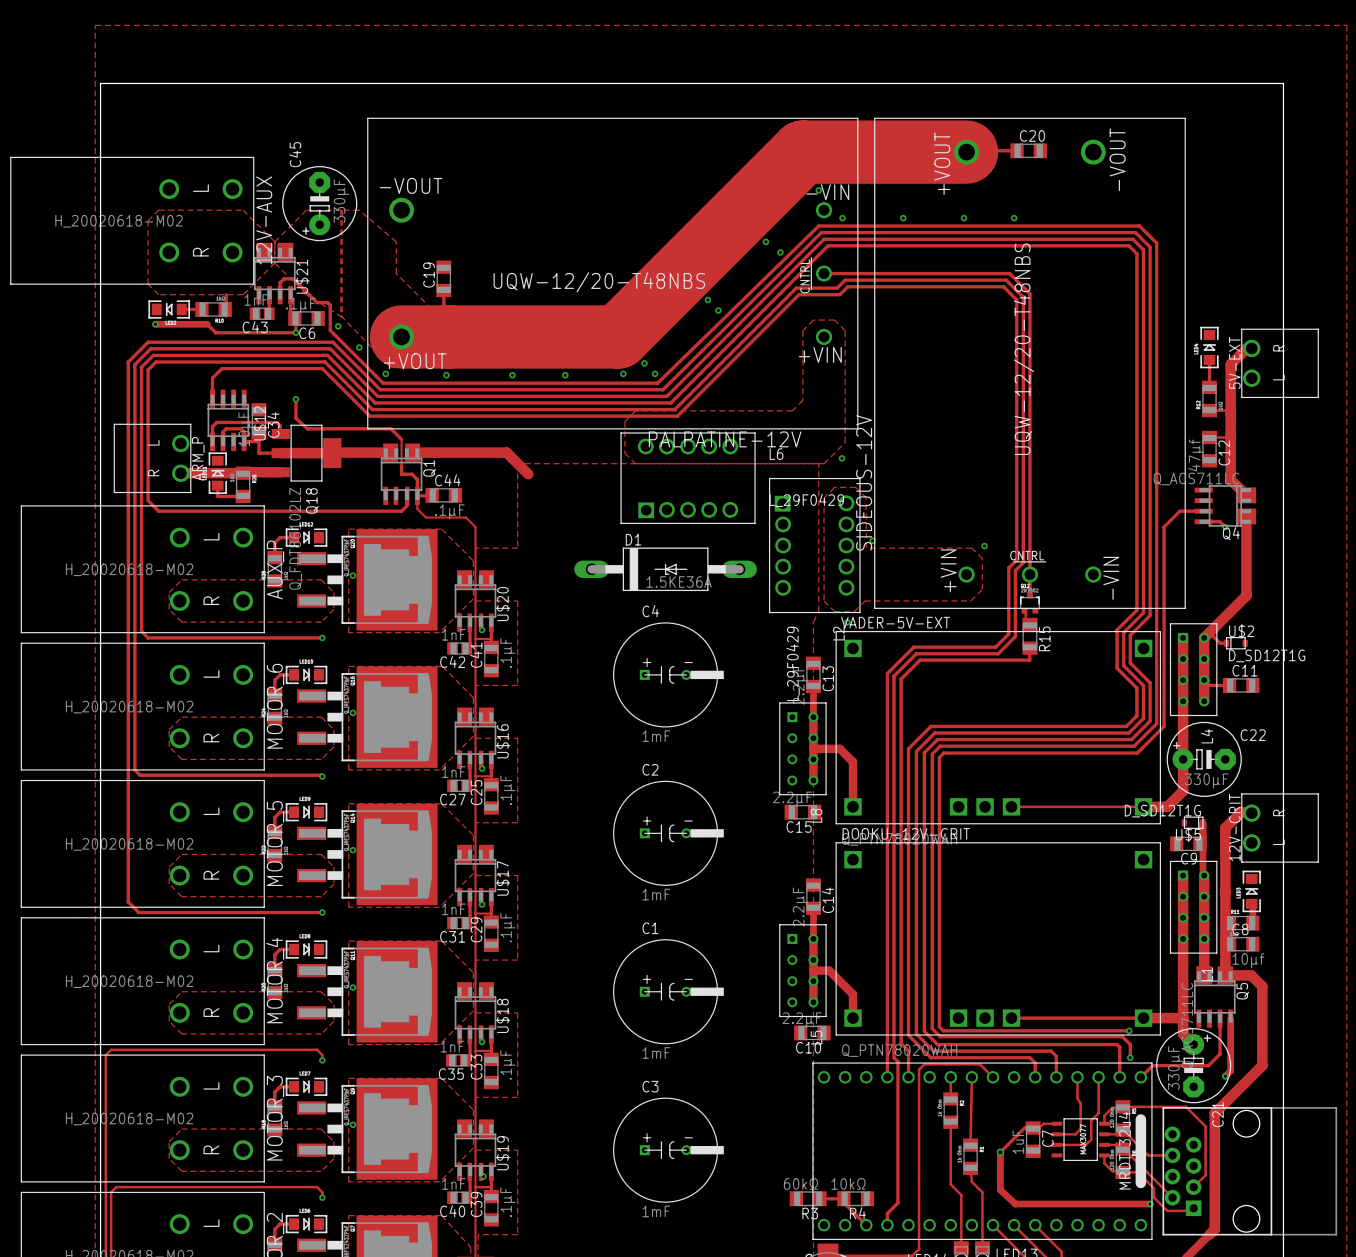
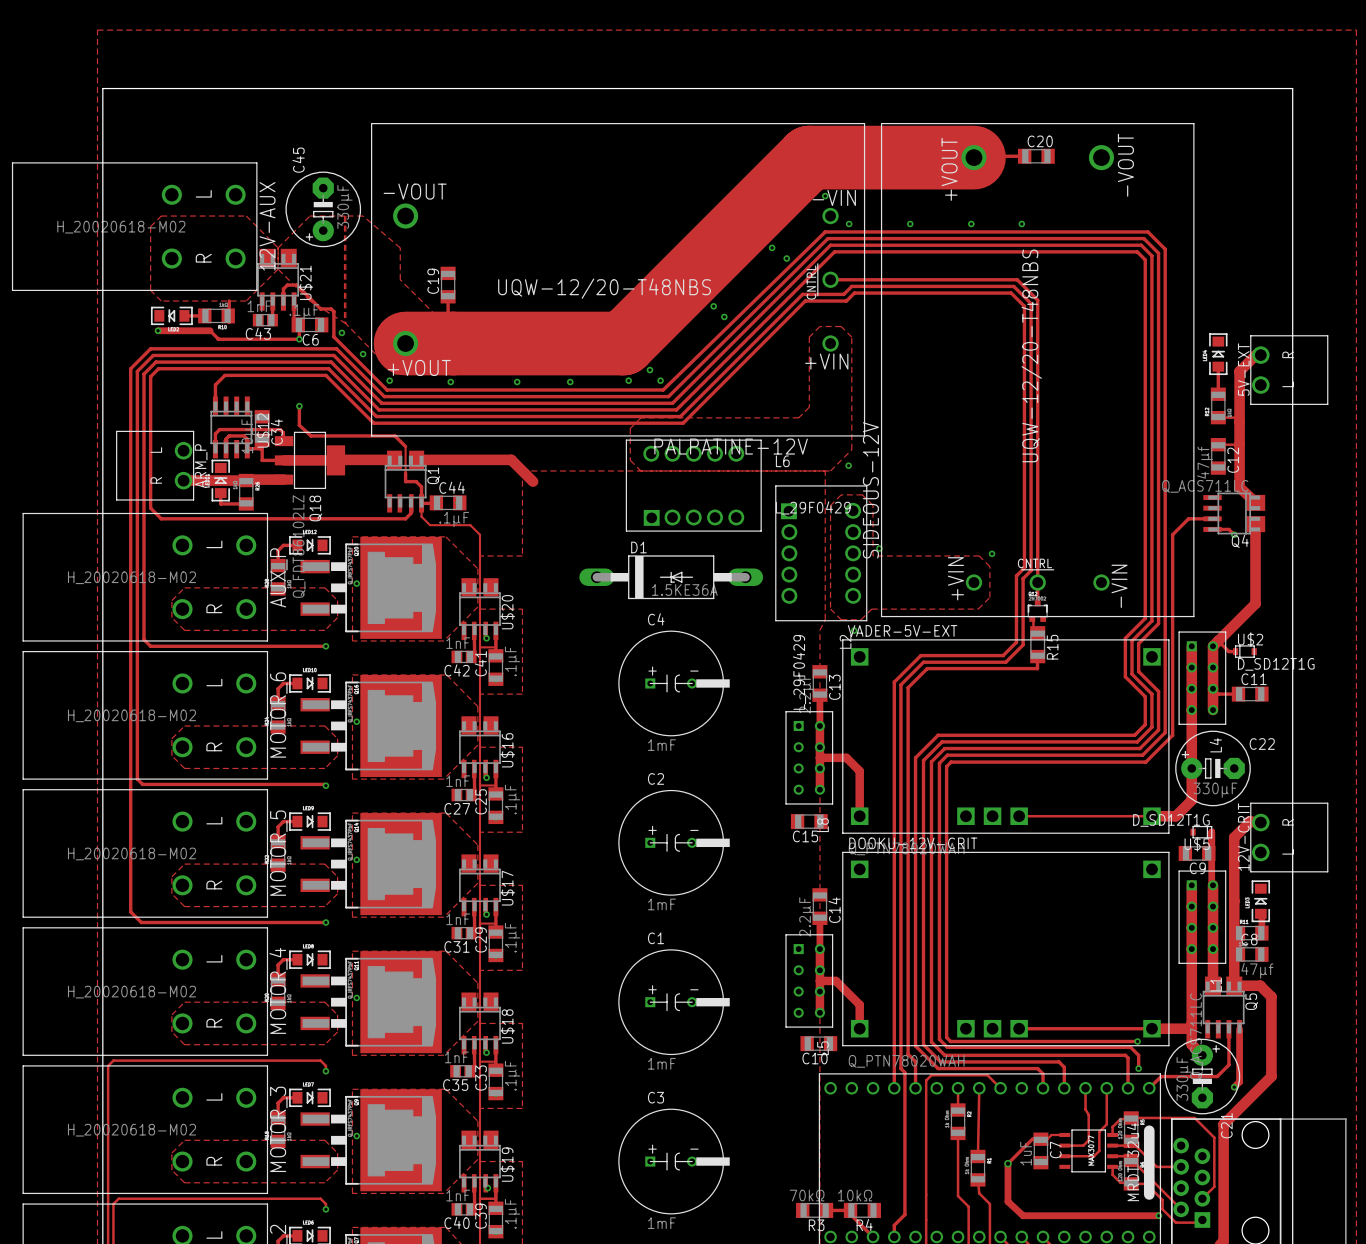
C15 value: 2.2µF (792, 799) -> none
C8 value: 10µf (1248, 960) -> 47µf (1257, 970)
C10 value: 2.2µF (802, 1019) -> none
R3 value: 60kΩ (800, 1183) -> 70kΩ (807, 1195)

